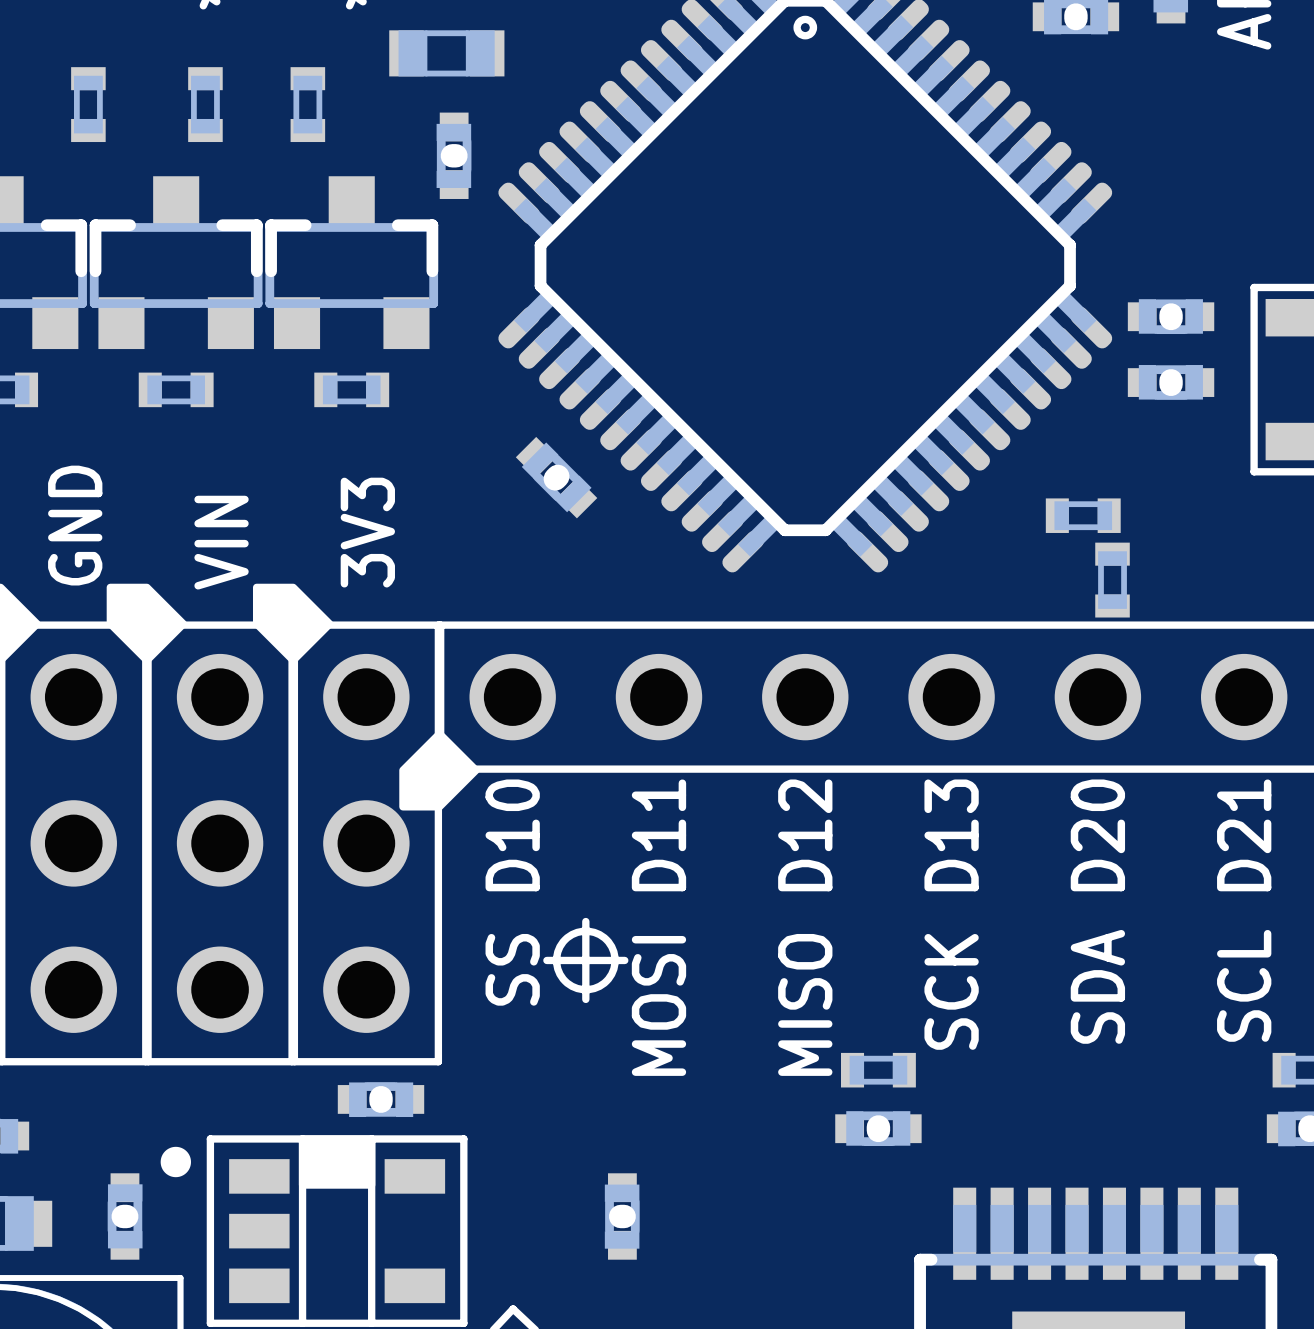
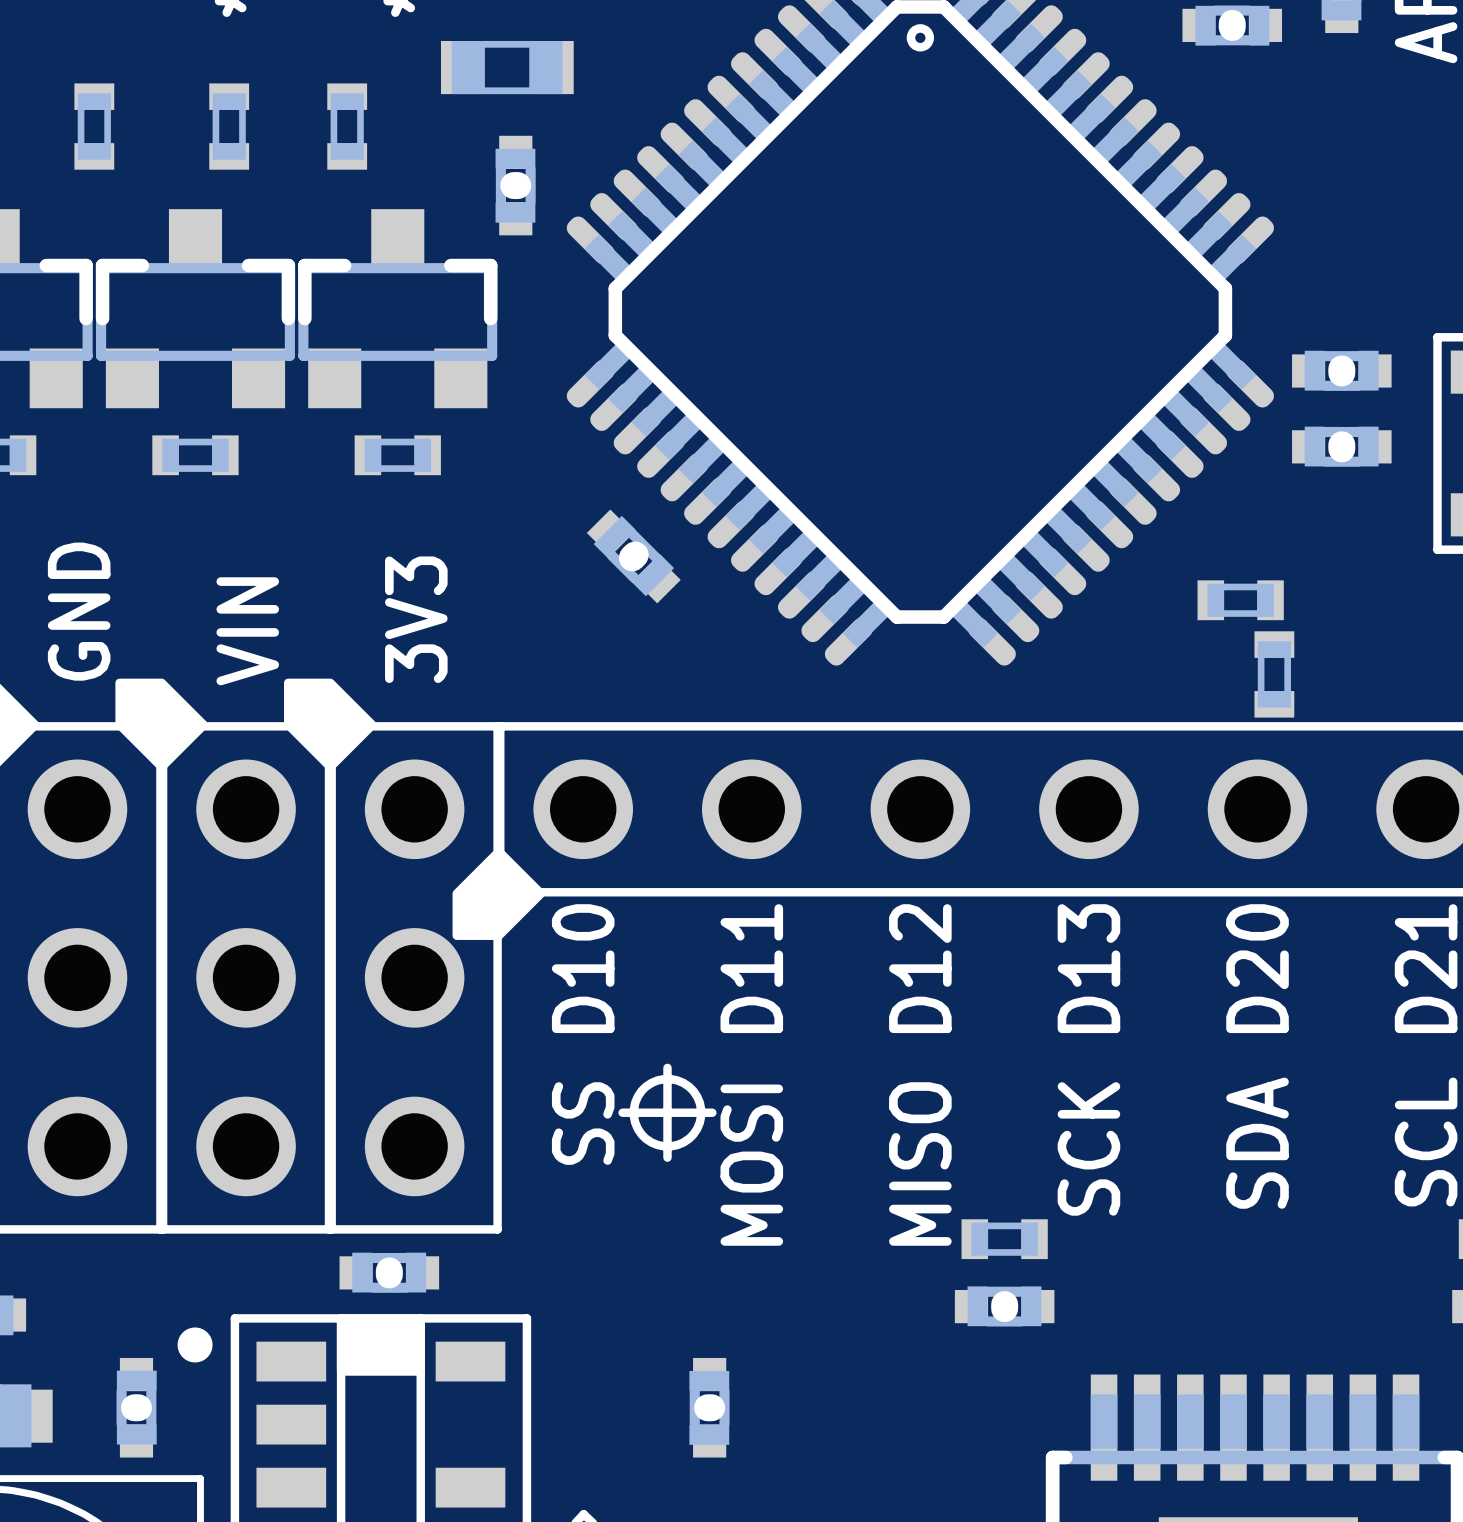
part position: (381, 1099) -> (389, 1272)

